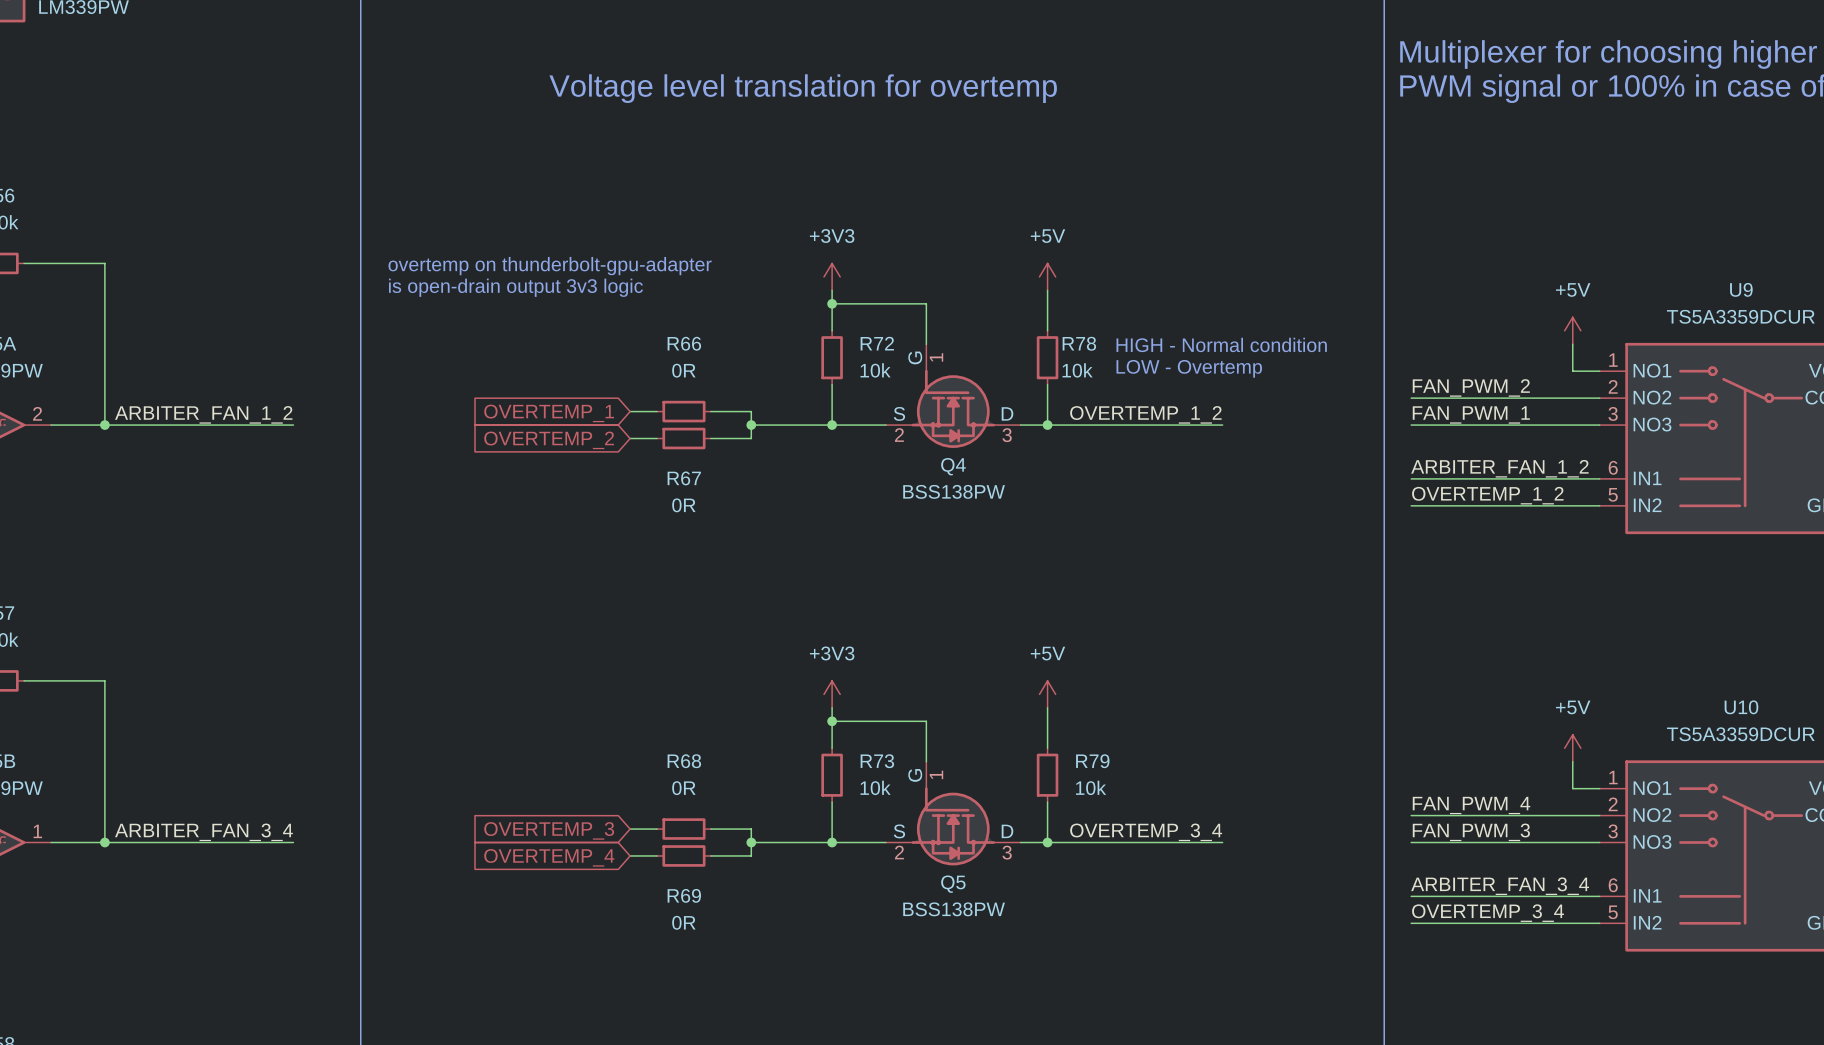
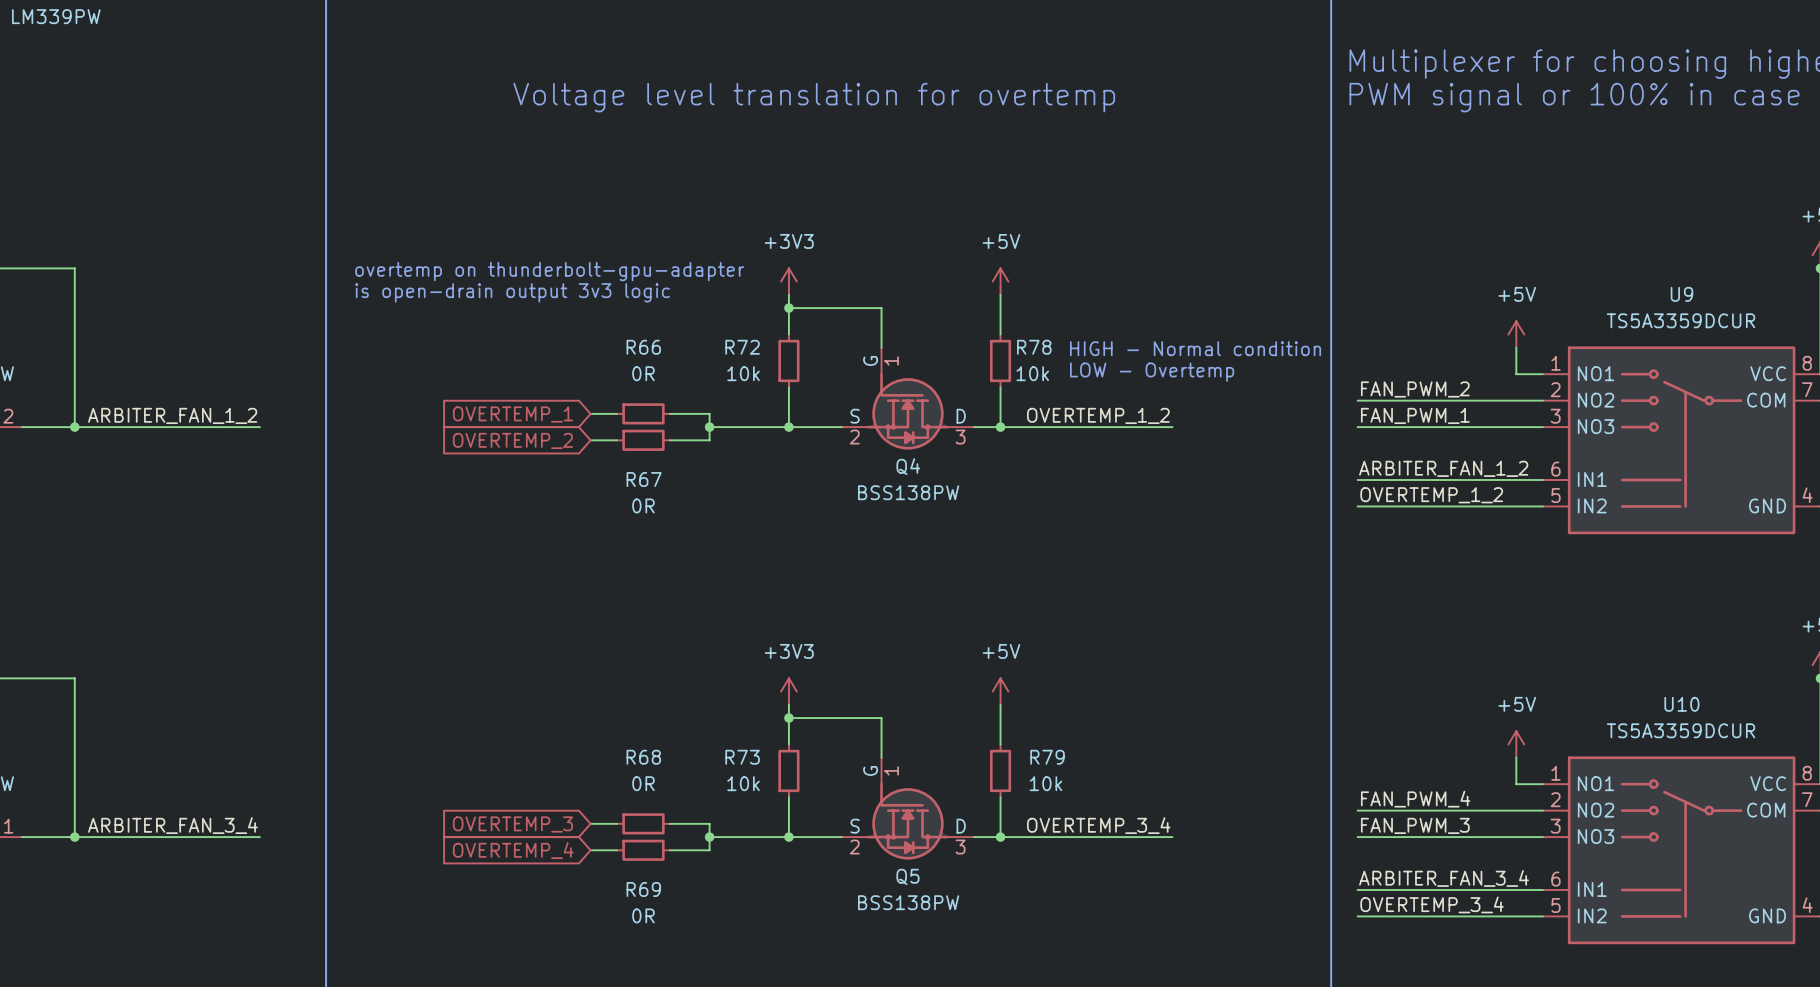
R72 name position: R72 (877, 343) -> R72 (742, 347)
R72 text position: 10k (875, 370) -> 10k (743, 373)
R73 name position: R73 (877, 761) -> R73 (742, 757)
R73 text position: 10k (875, 787) -> 10k (743, 783)

